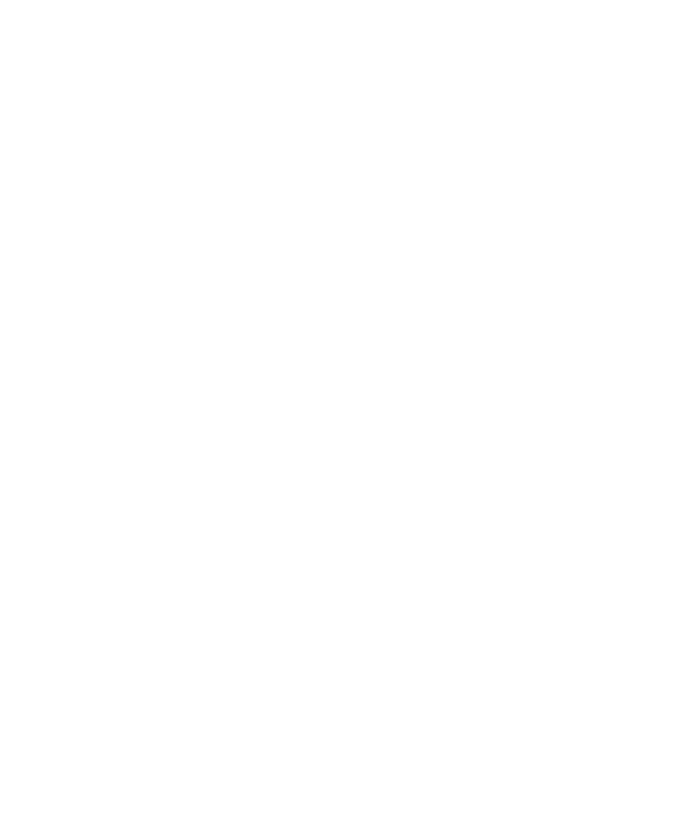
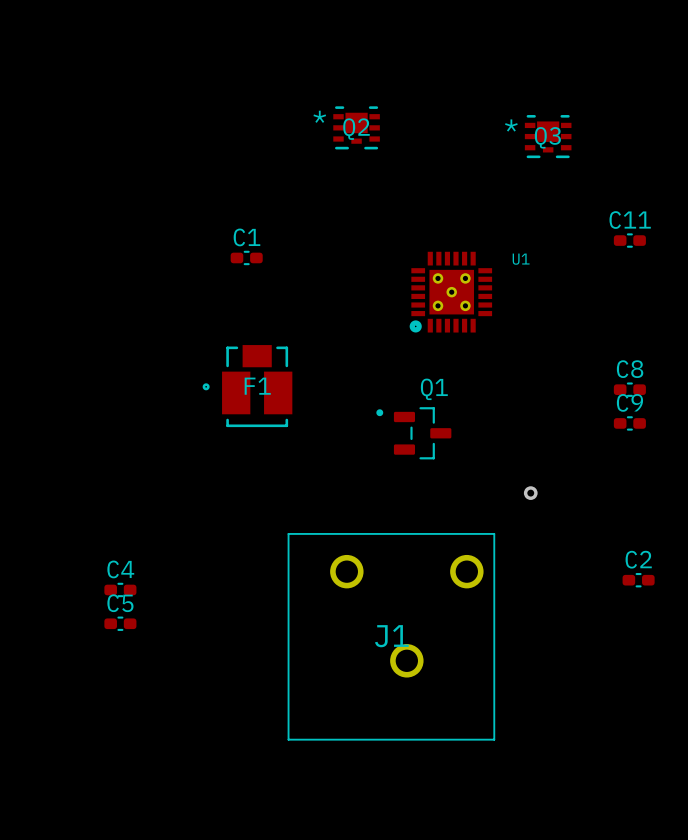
Q2: none -> (356, 127)
Q3: none -> (548, 136)
C11: none -> (629, 240)
C1: none -> (246, 257)
U1: none -> (450, 292)
F1: none -> (247, 386)
C8: none -> (629, 389)
C9: none -> (629, 423)
Q1: none -> (413, 433)
via: none -> (530, 493)
C2: none -> (638, 580)
C4: none -> (120, 589)
C5: none -> (120, 623)
J1: none -> (391, 636)

